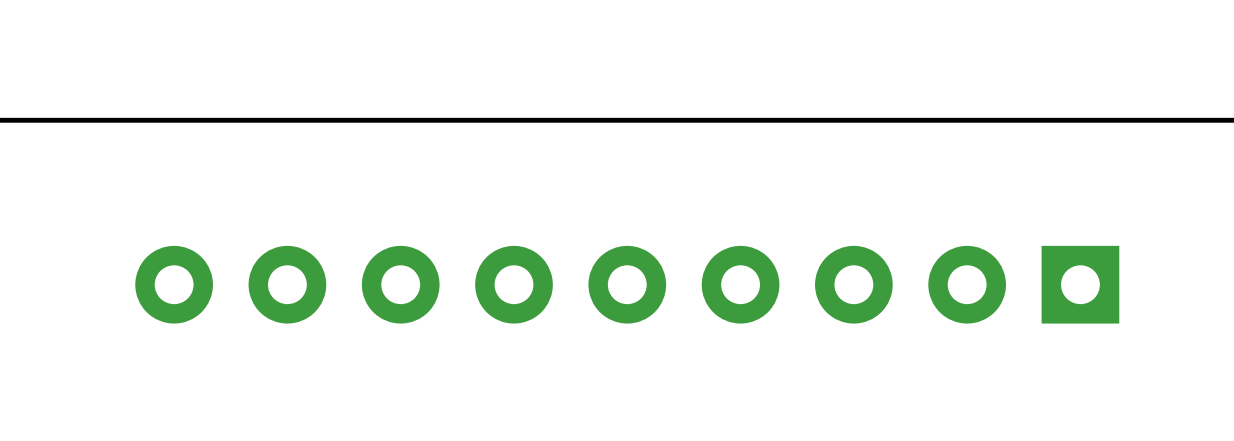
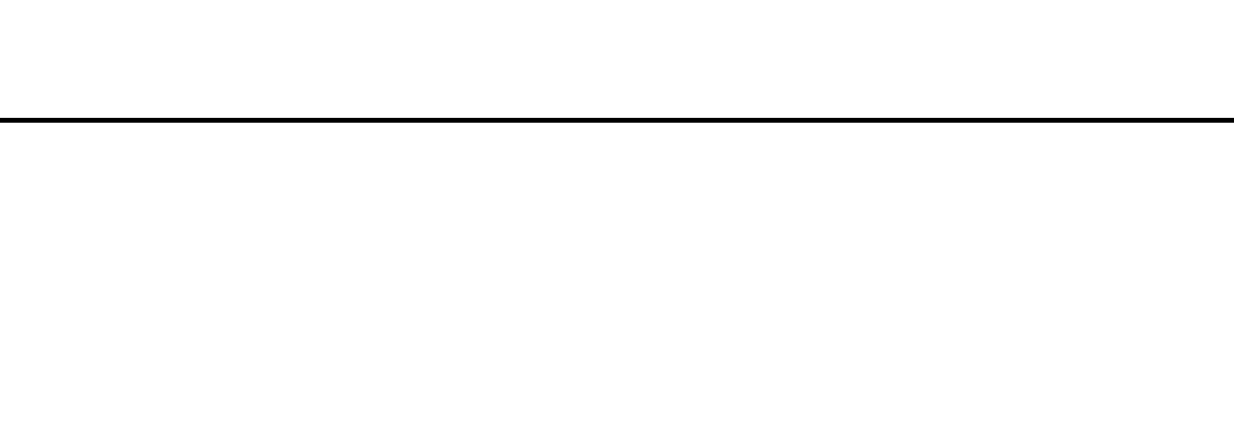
part: (627, 284) -> none

